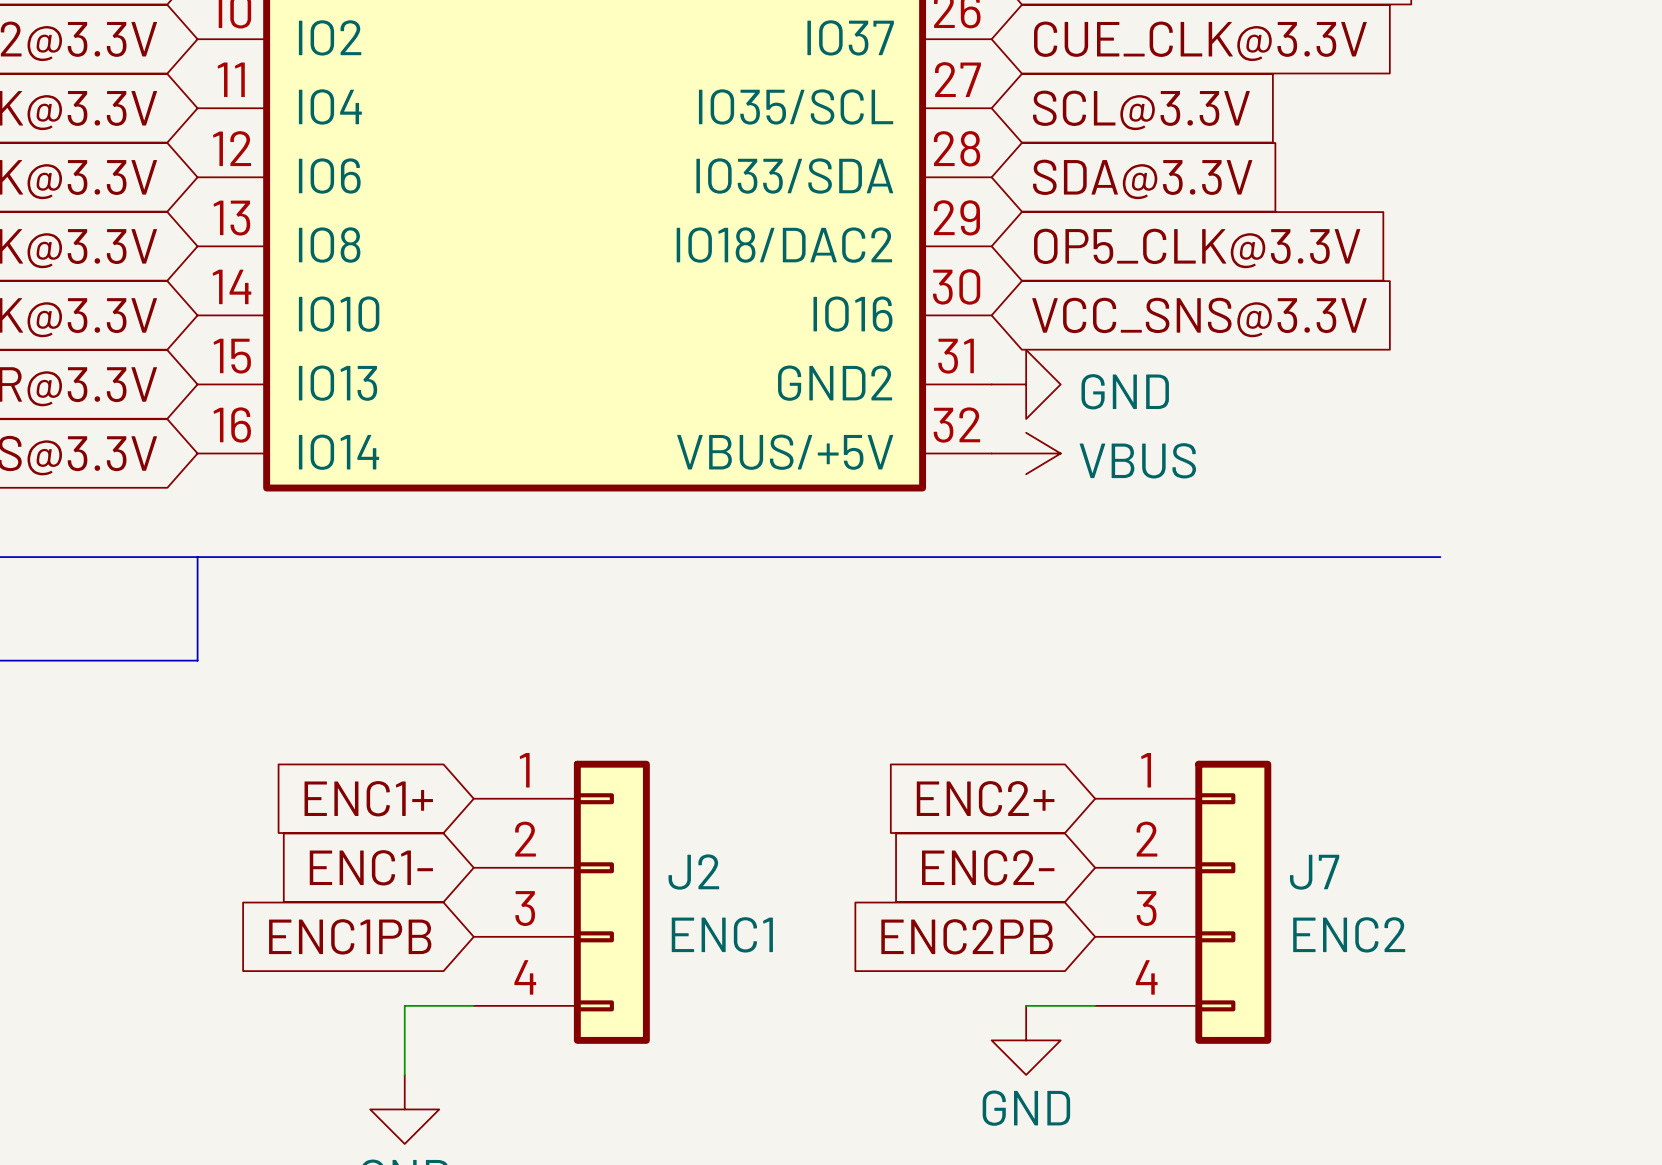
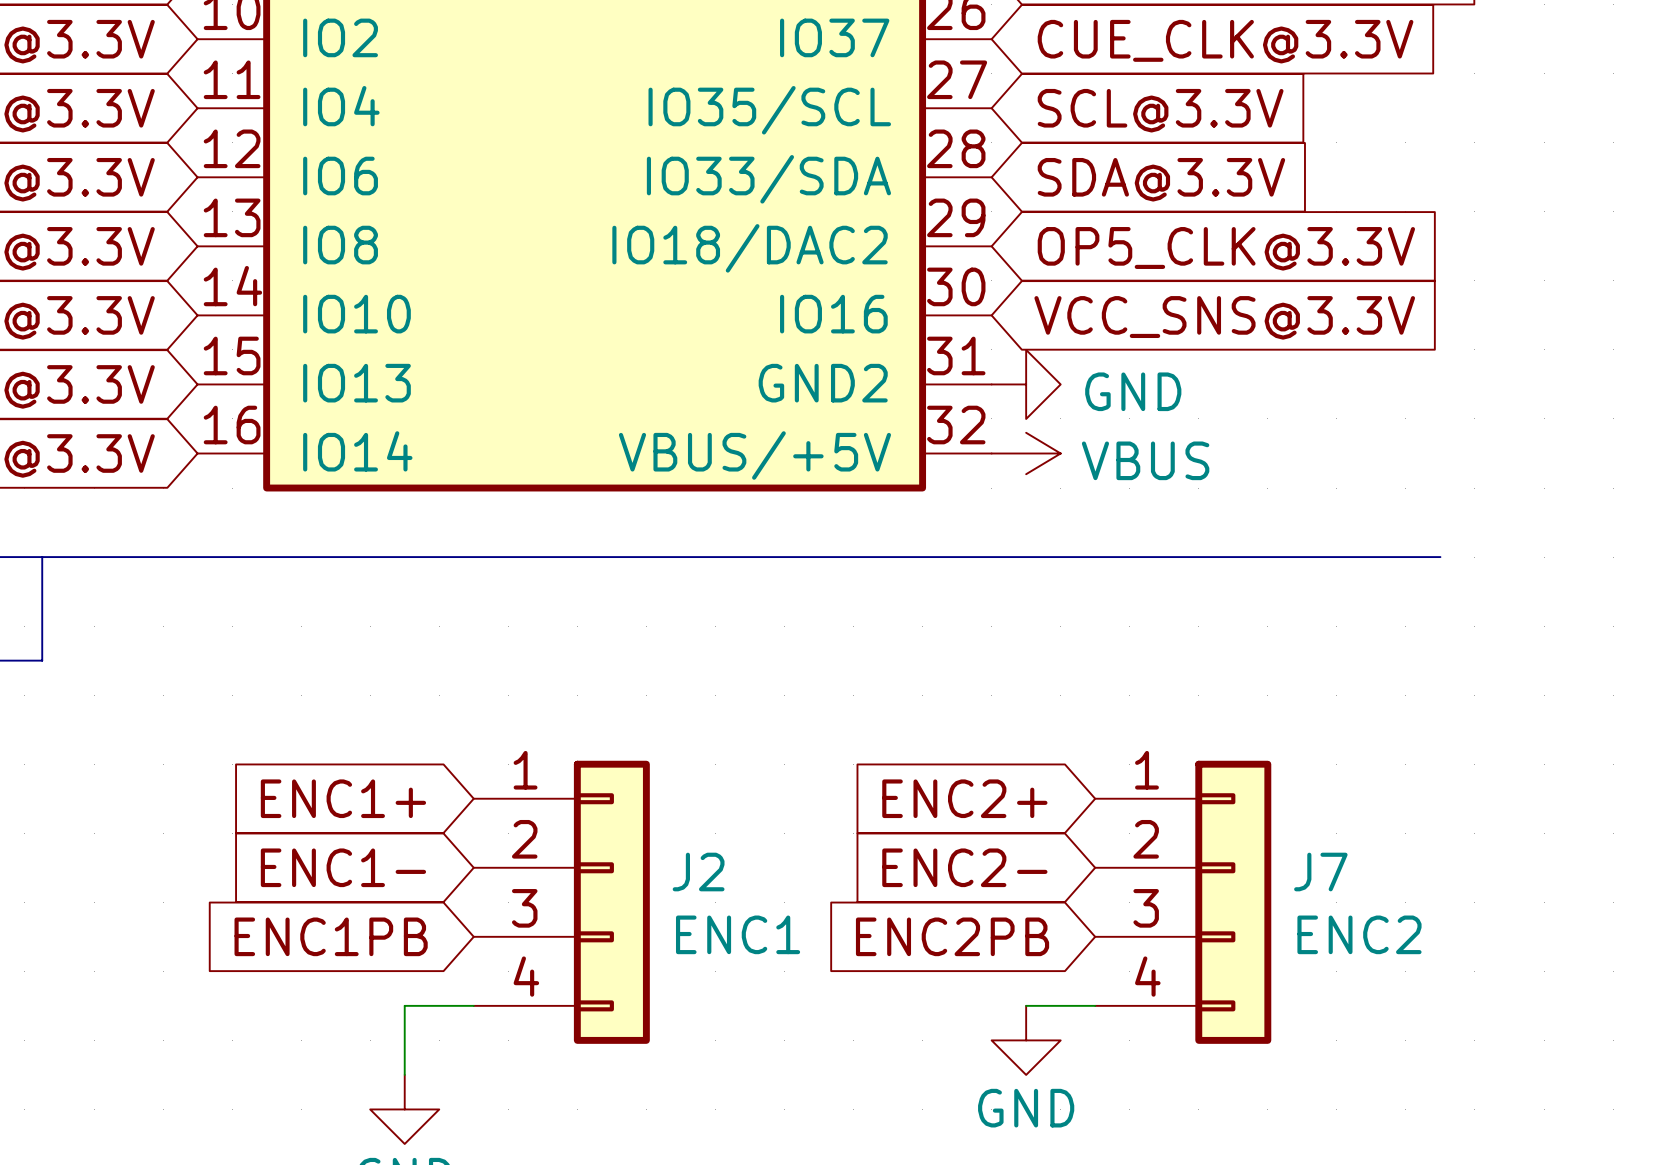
line: (197, 557) (197, 660) (42, 660) -> (42, 557) (42, 660)

